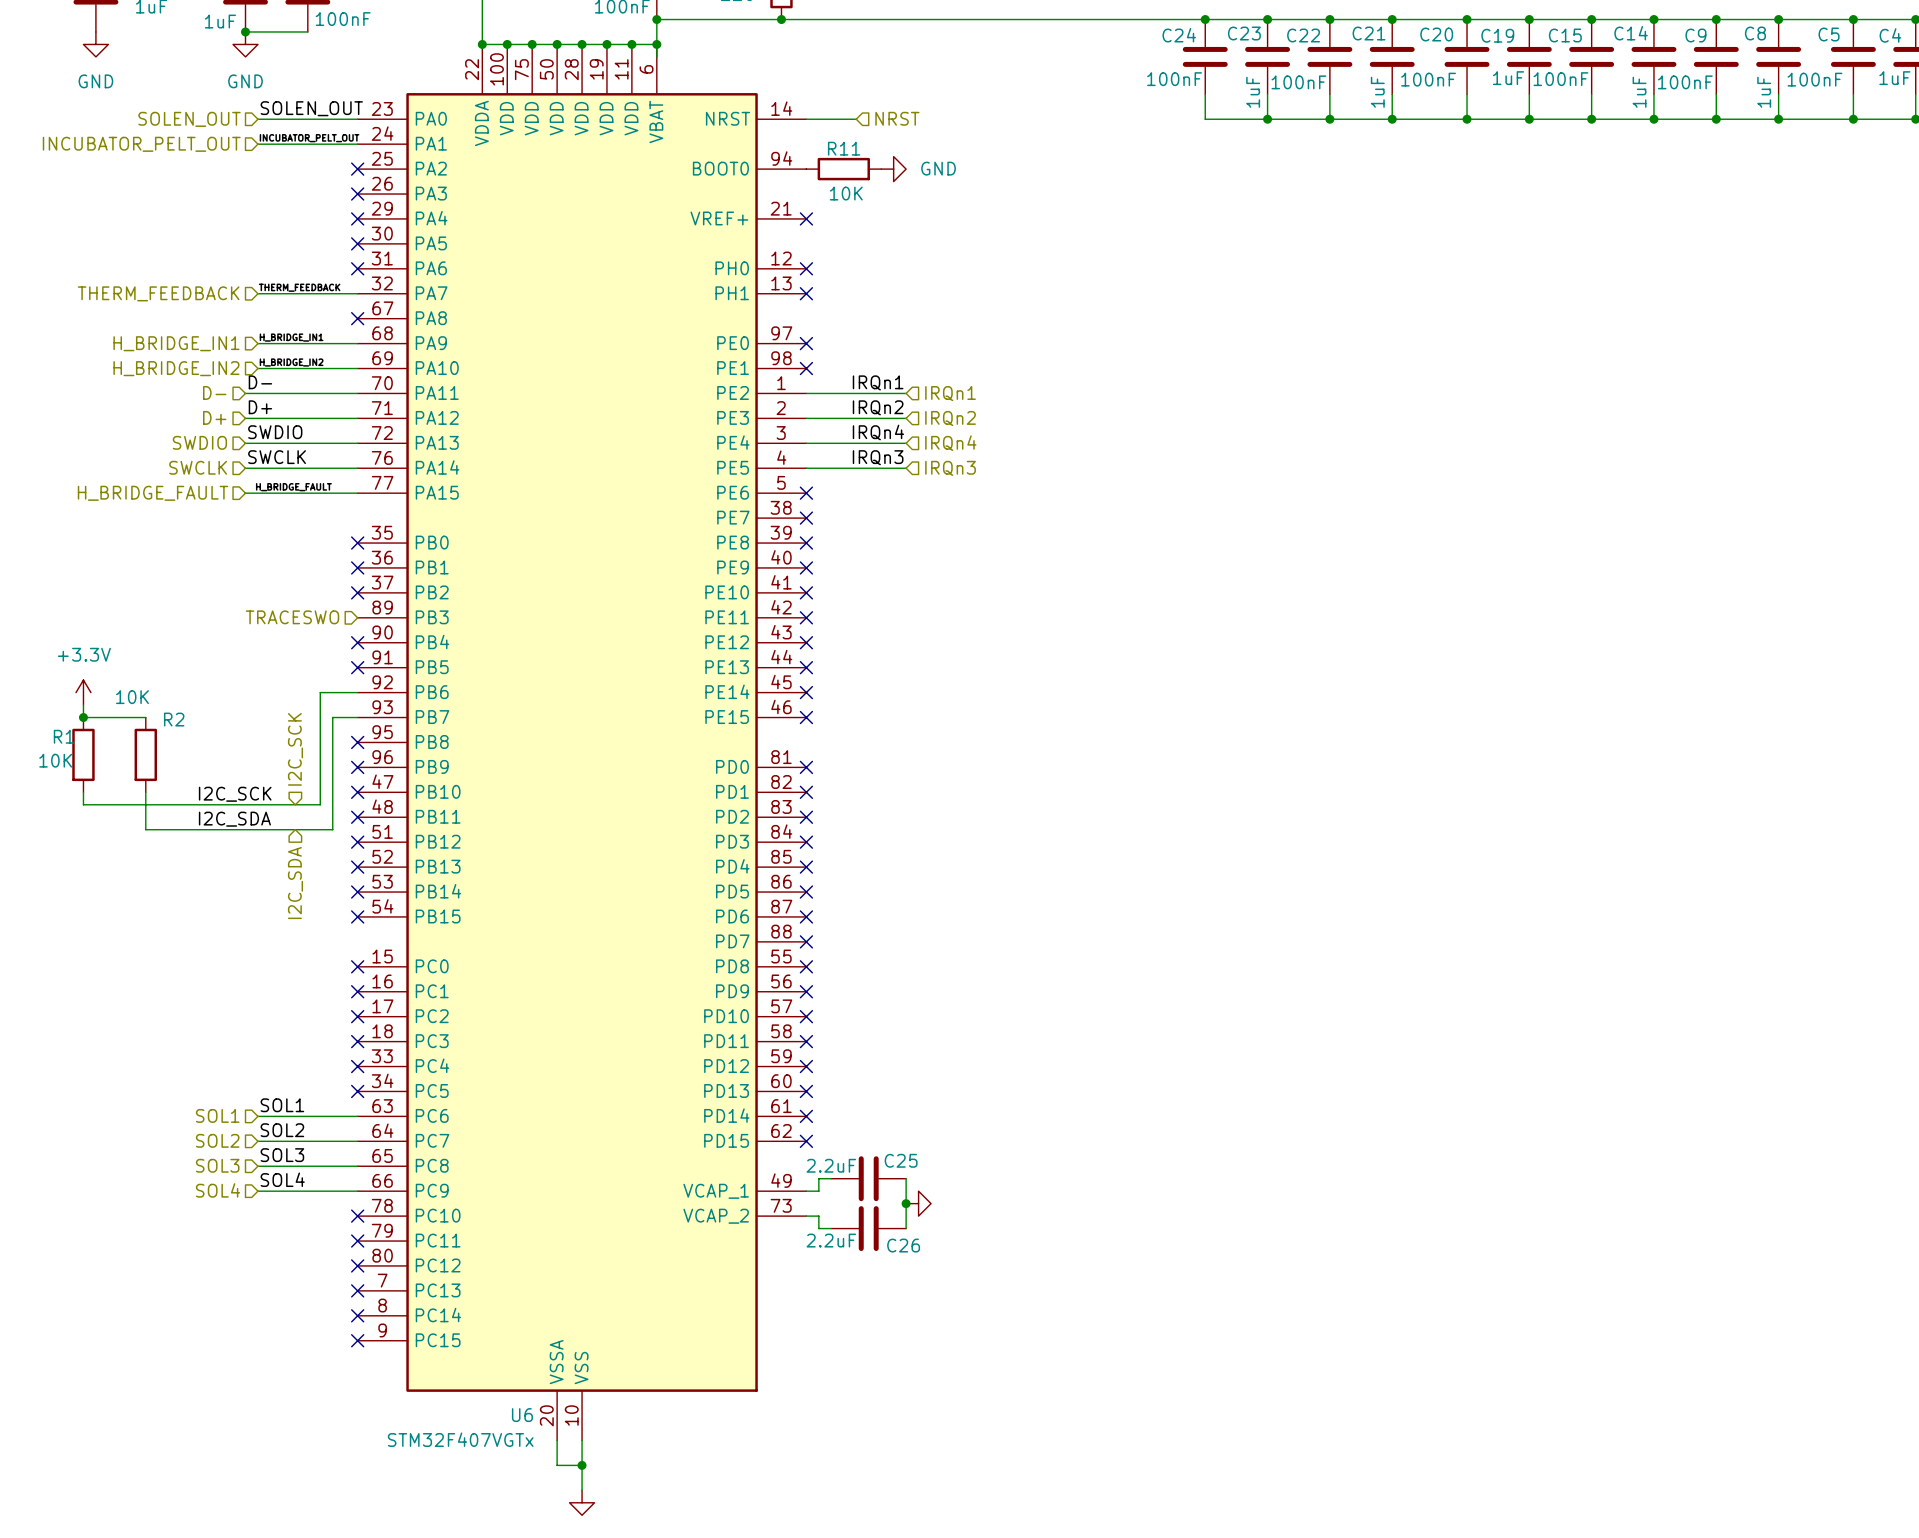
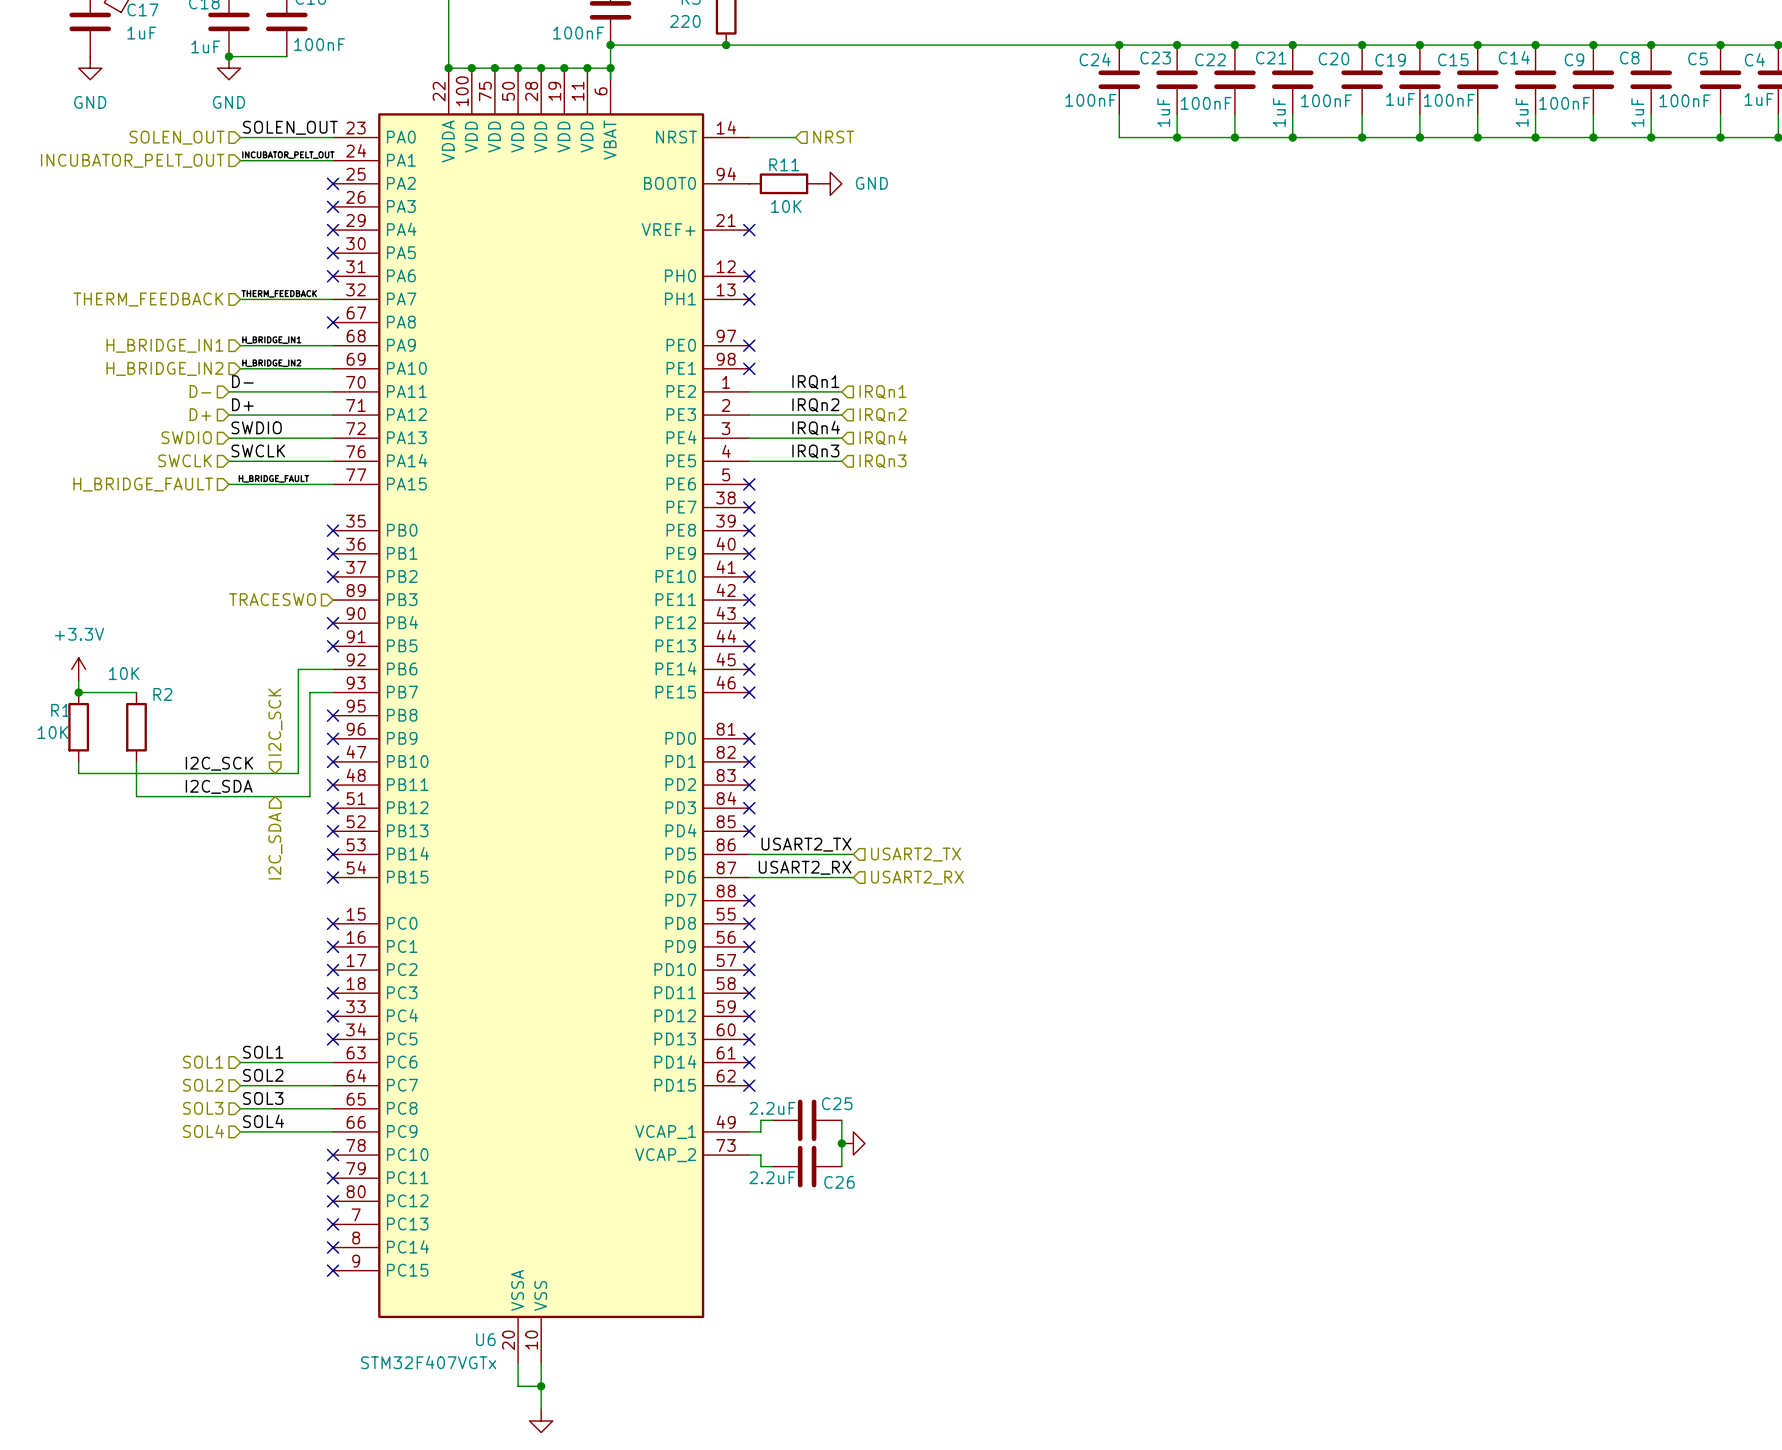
label: none -> USART2_TX (806, 844)
wire: none -> (749, 854) (853, 854)
no-connect mark: (806, 892) -> none
hierarchical label: none -> USART2_TX (916, 854)
label: none -> USART2_RX (805, 867)
wire: none -> (749, 877) (853, 877)
no-connect mark: (806, 916) -> none
hierarchical label: none -> USART2_RX (917, 877)

